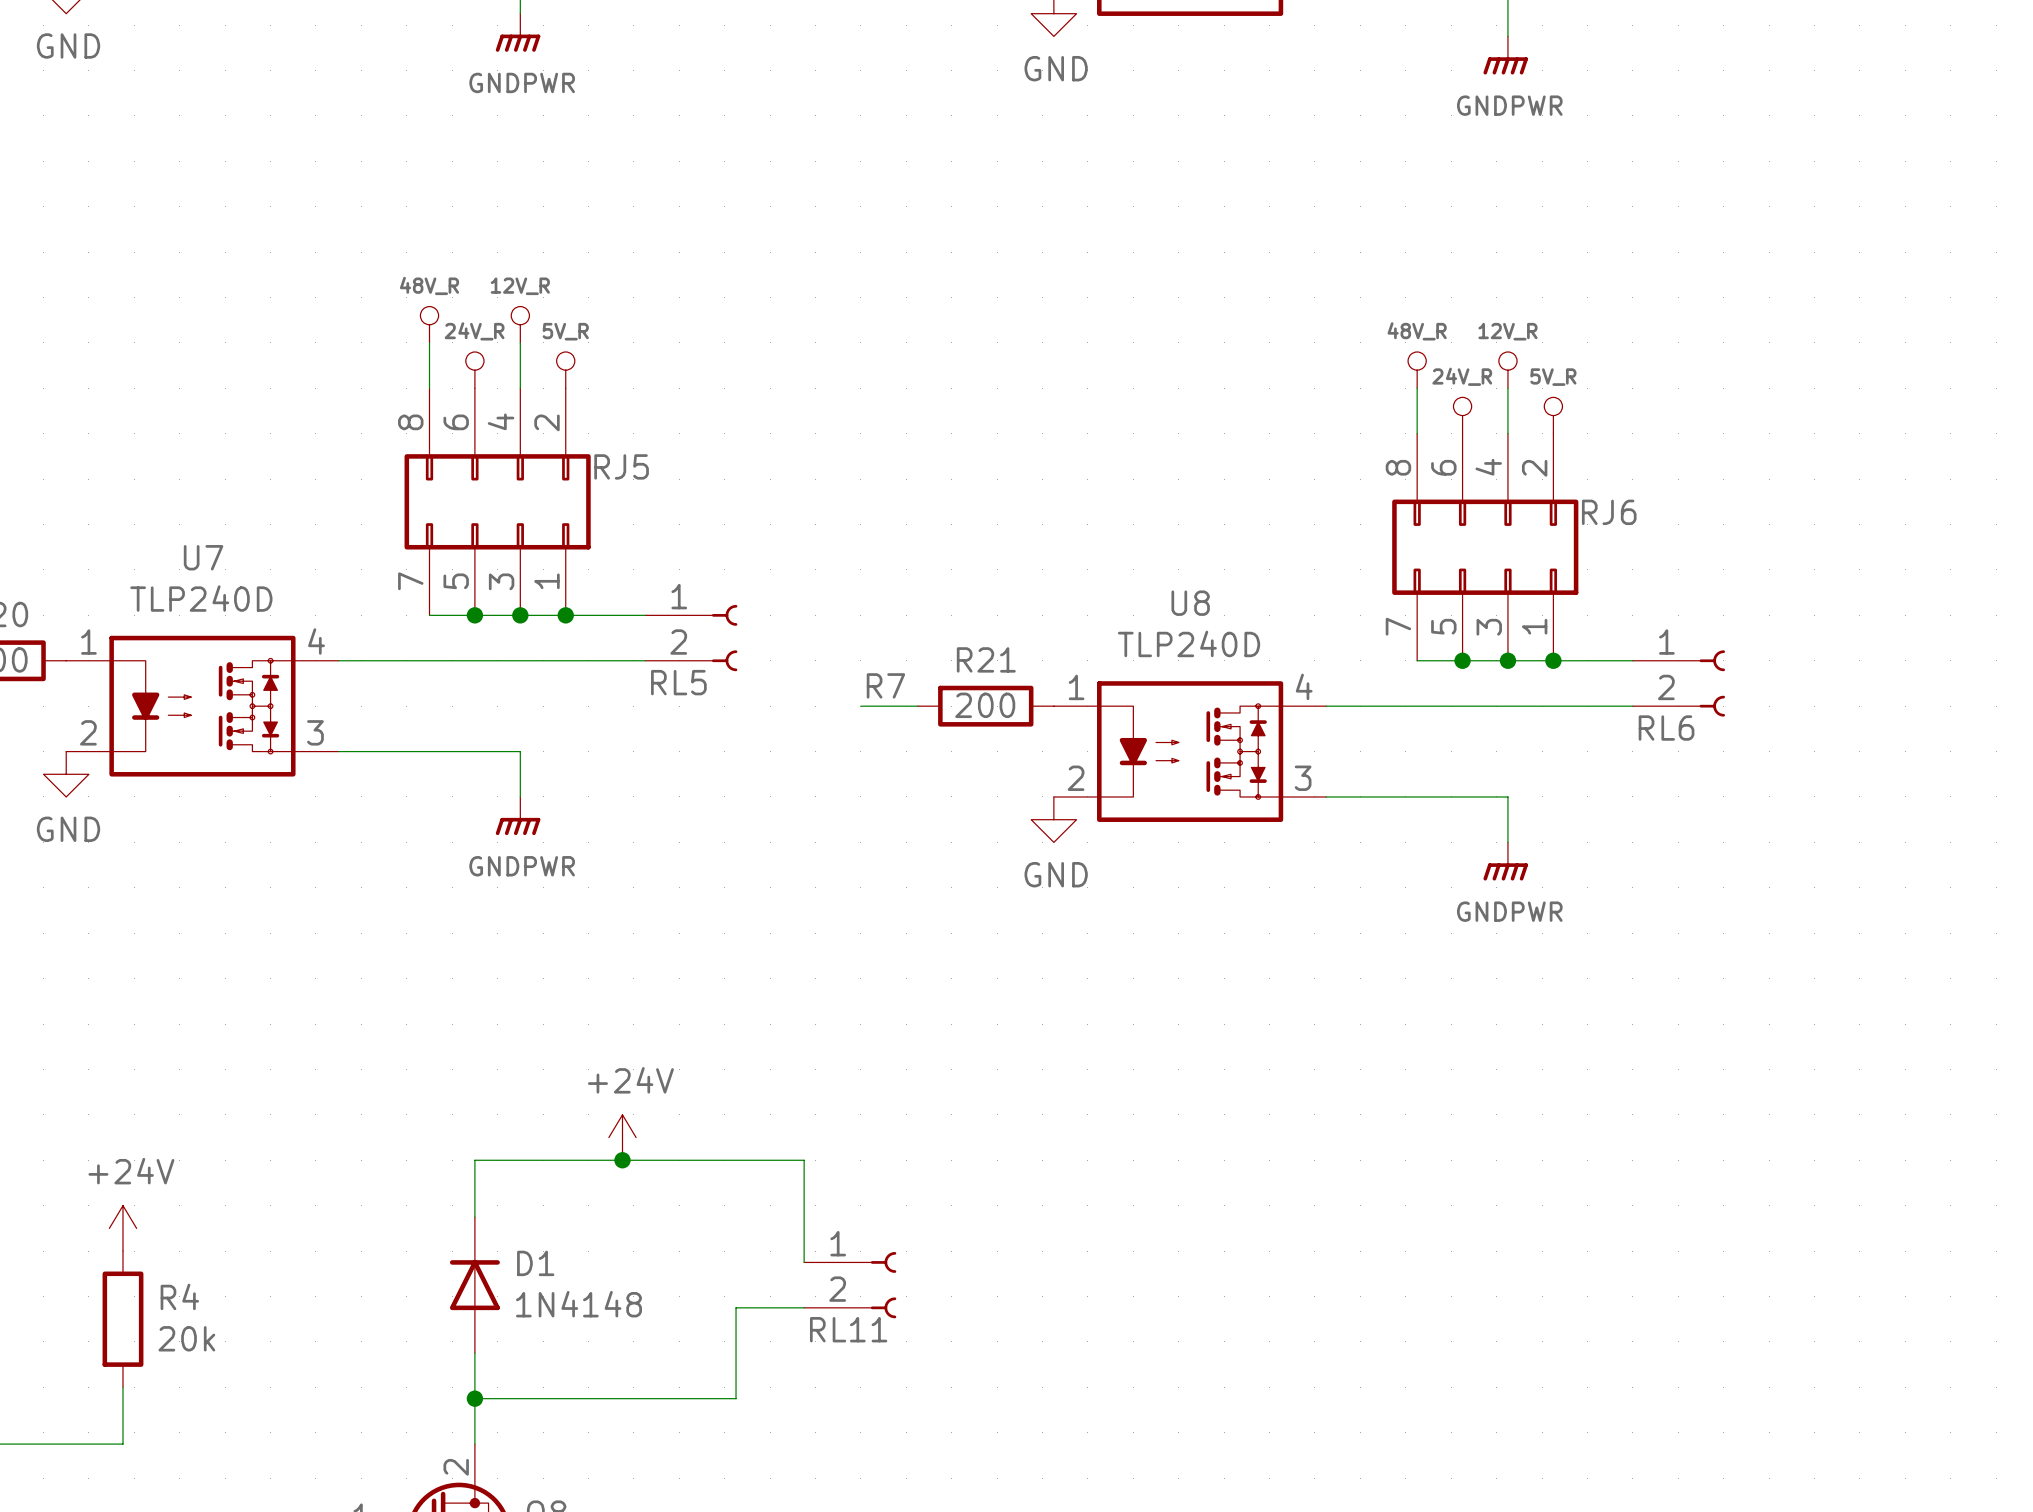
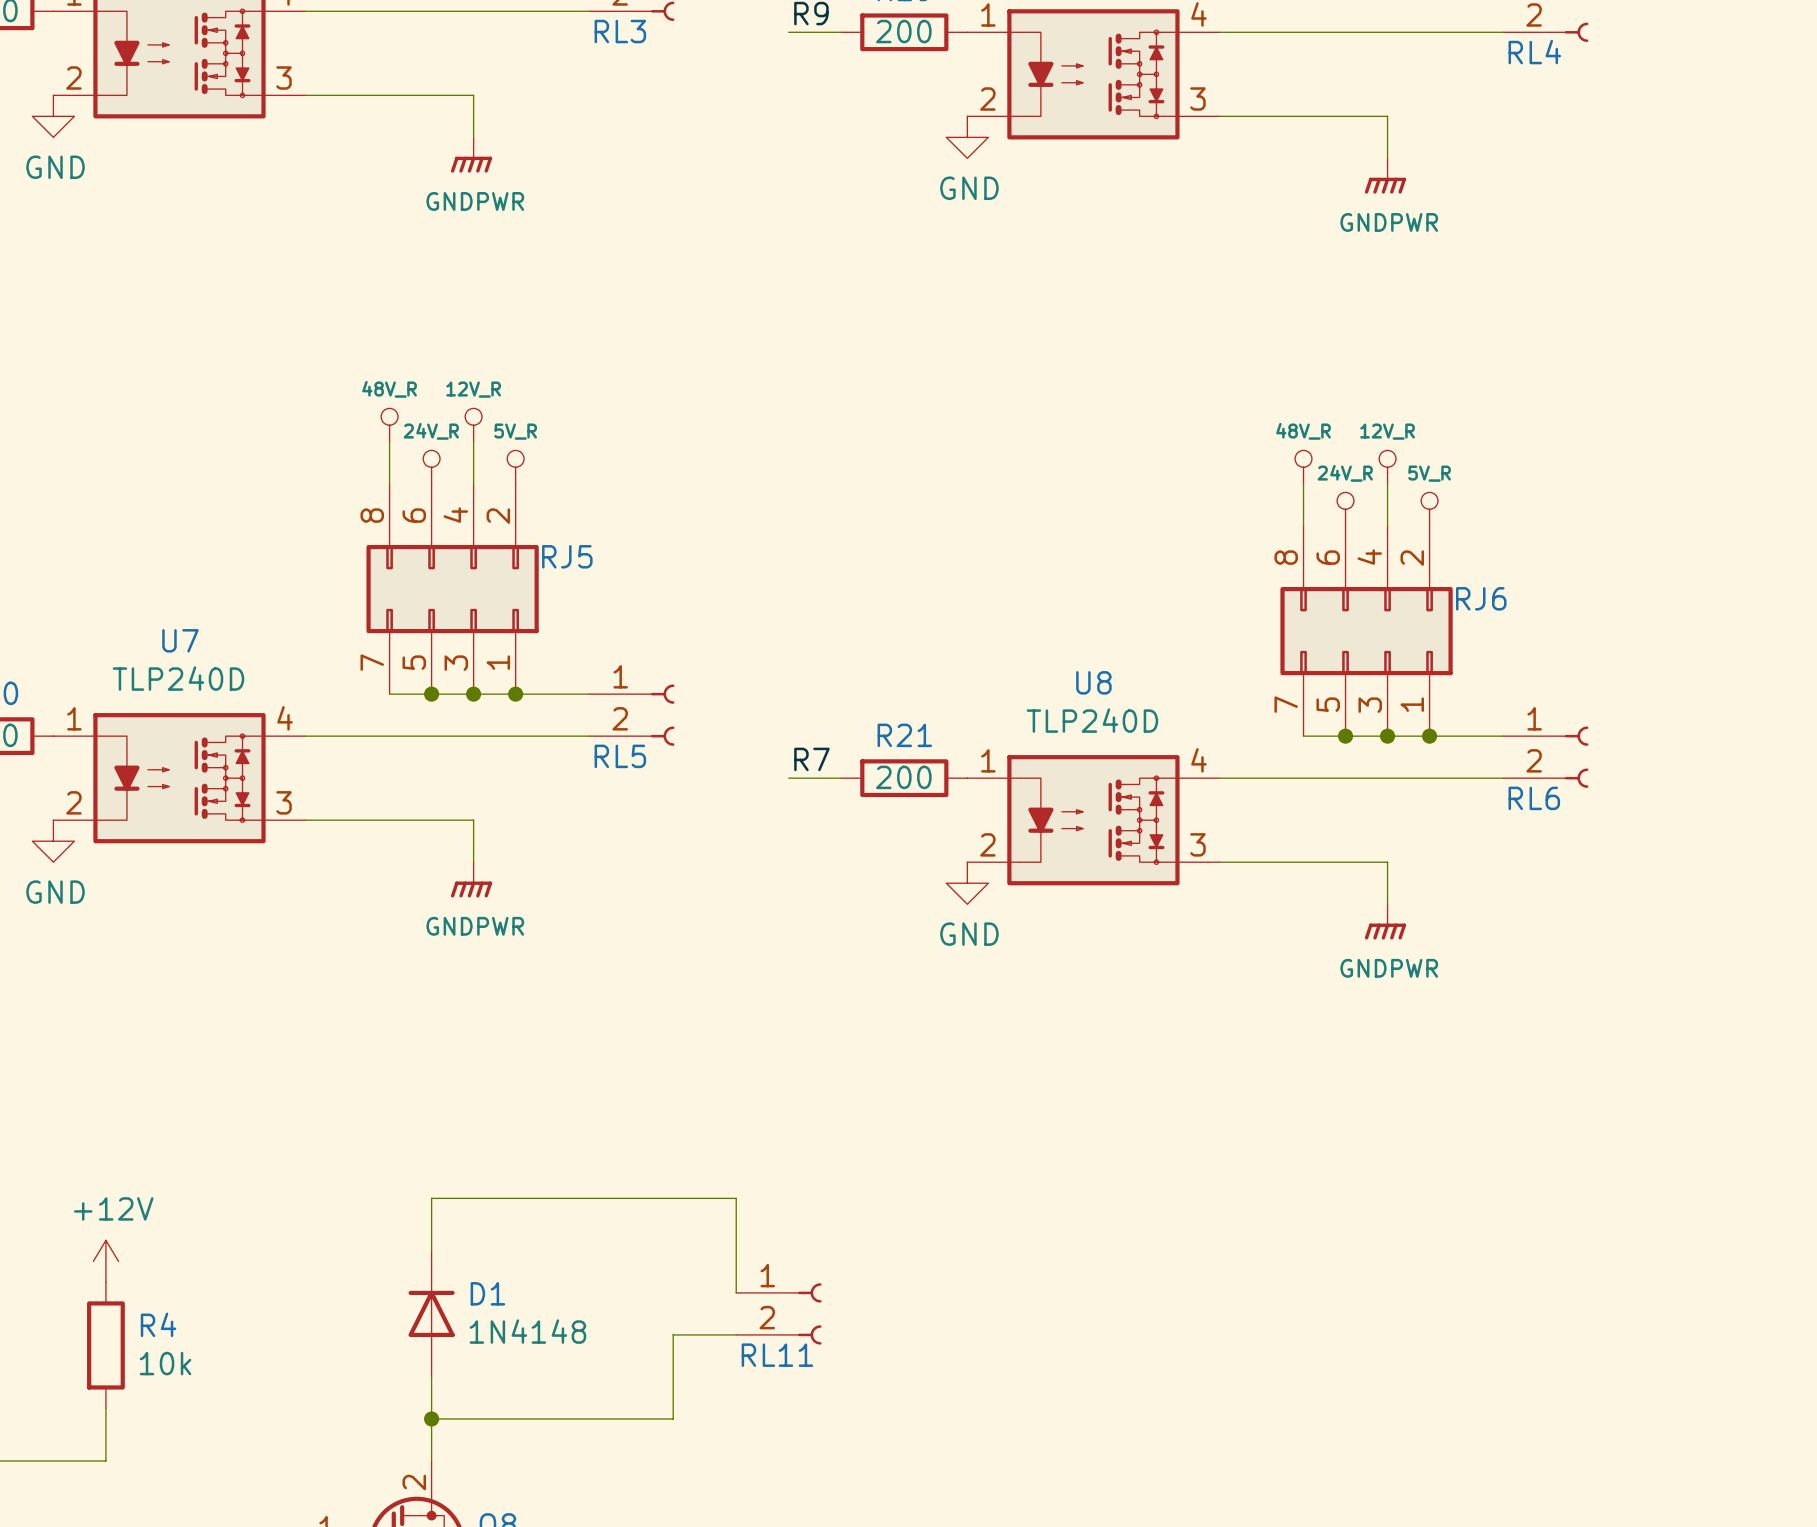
power symbol: +24V (622, 1137) -> none
junction: (622, 1160) -> none
power symbol: +24V (122, 1228) -> +12V (105, 1261)
R4 value: 20k (186, 1338) -> 10k (165, 1363)

